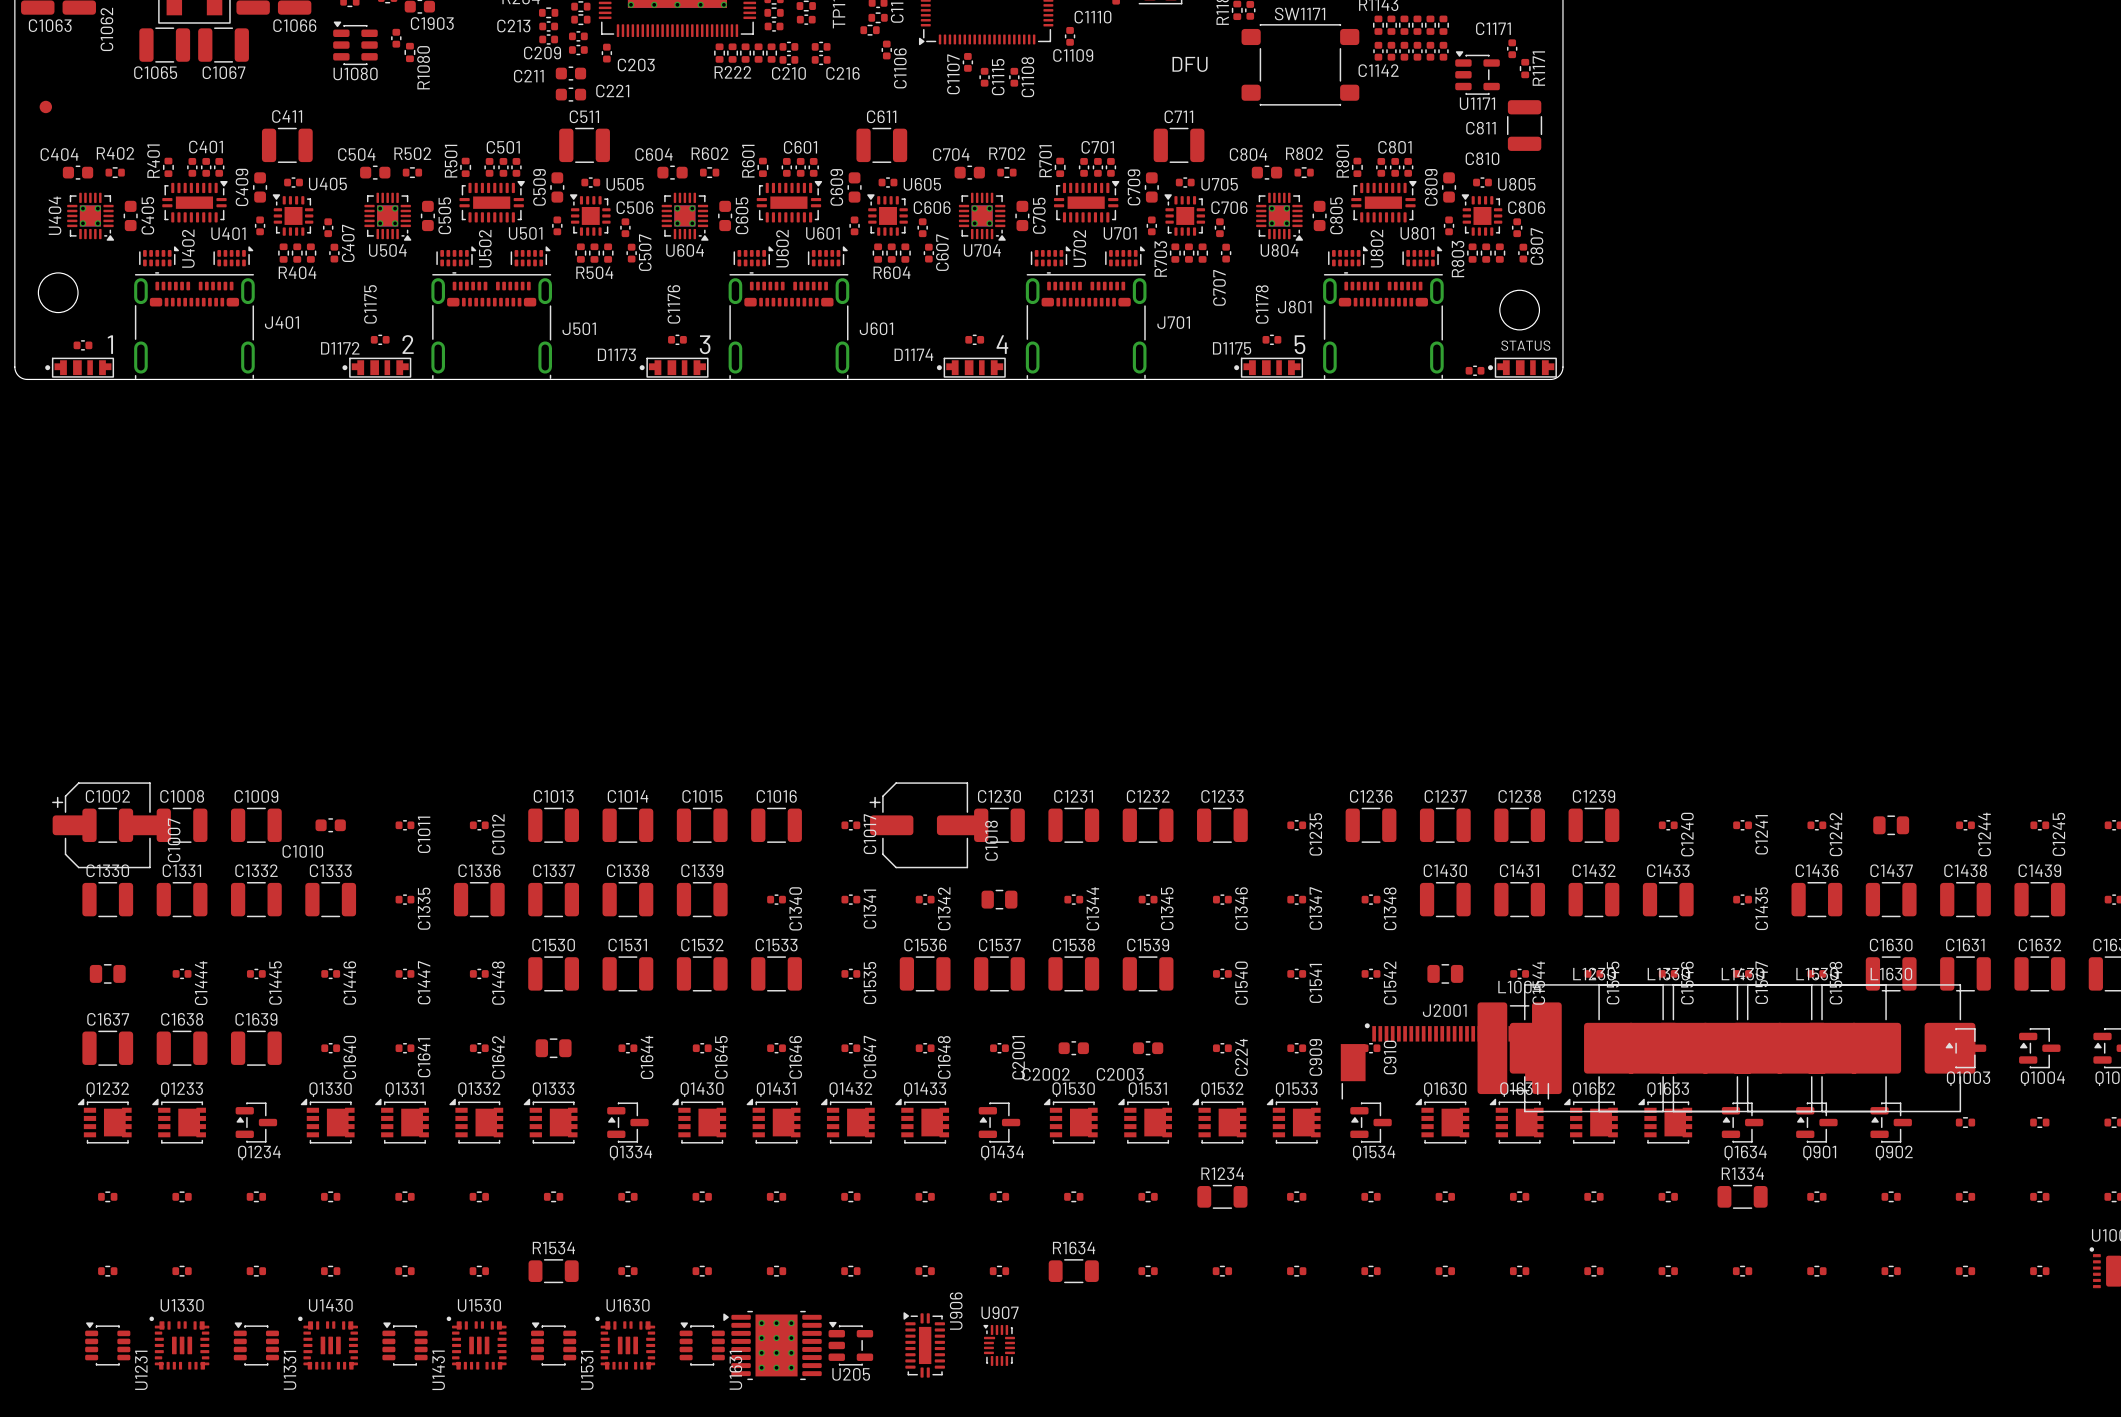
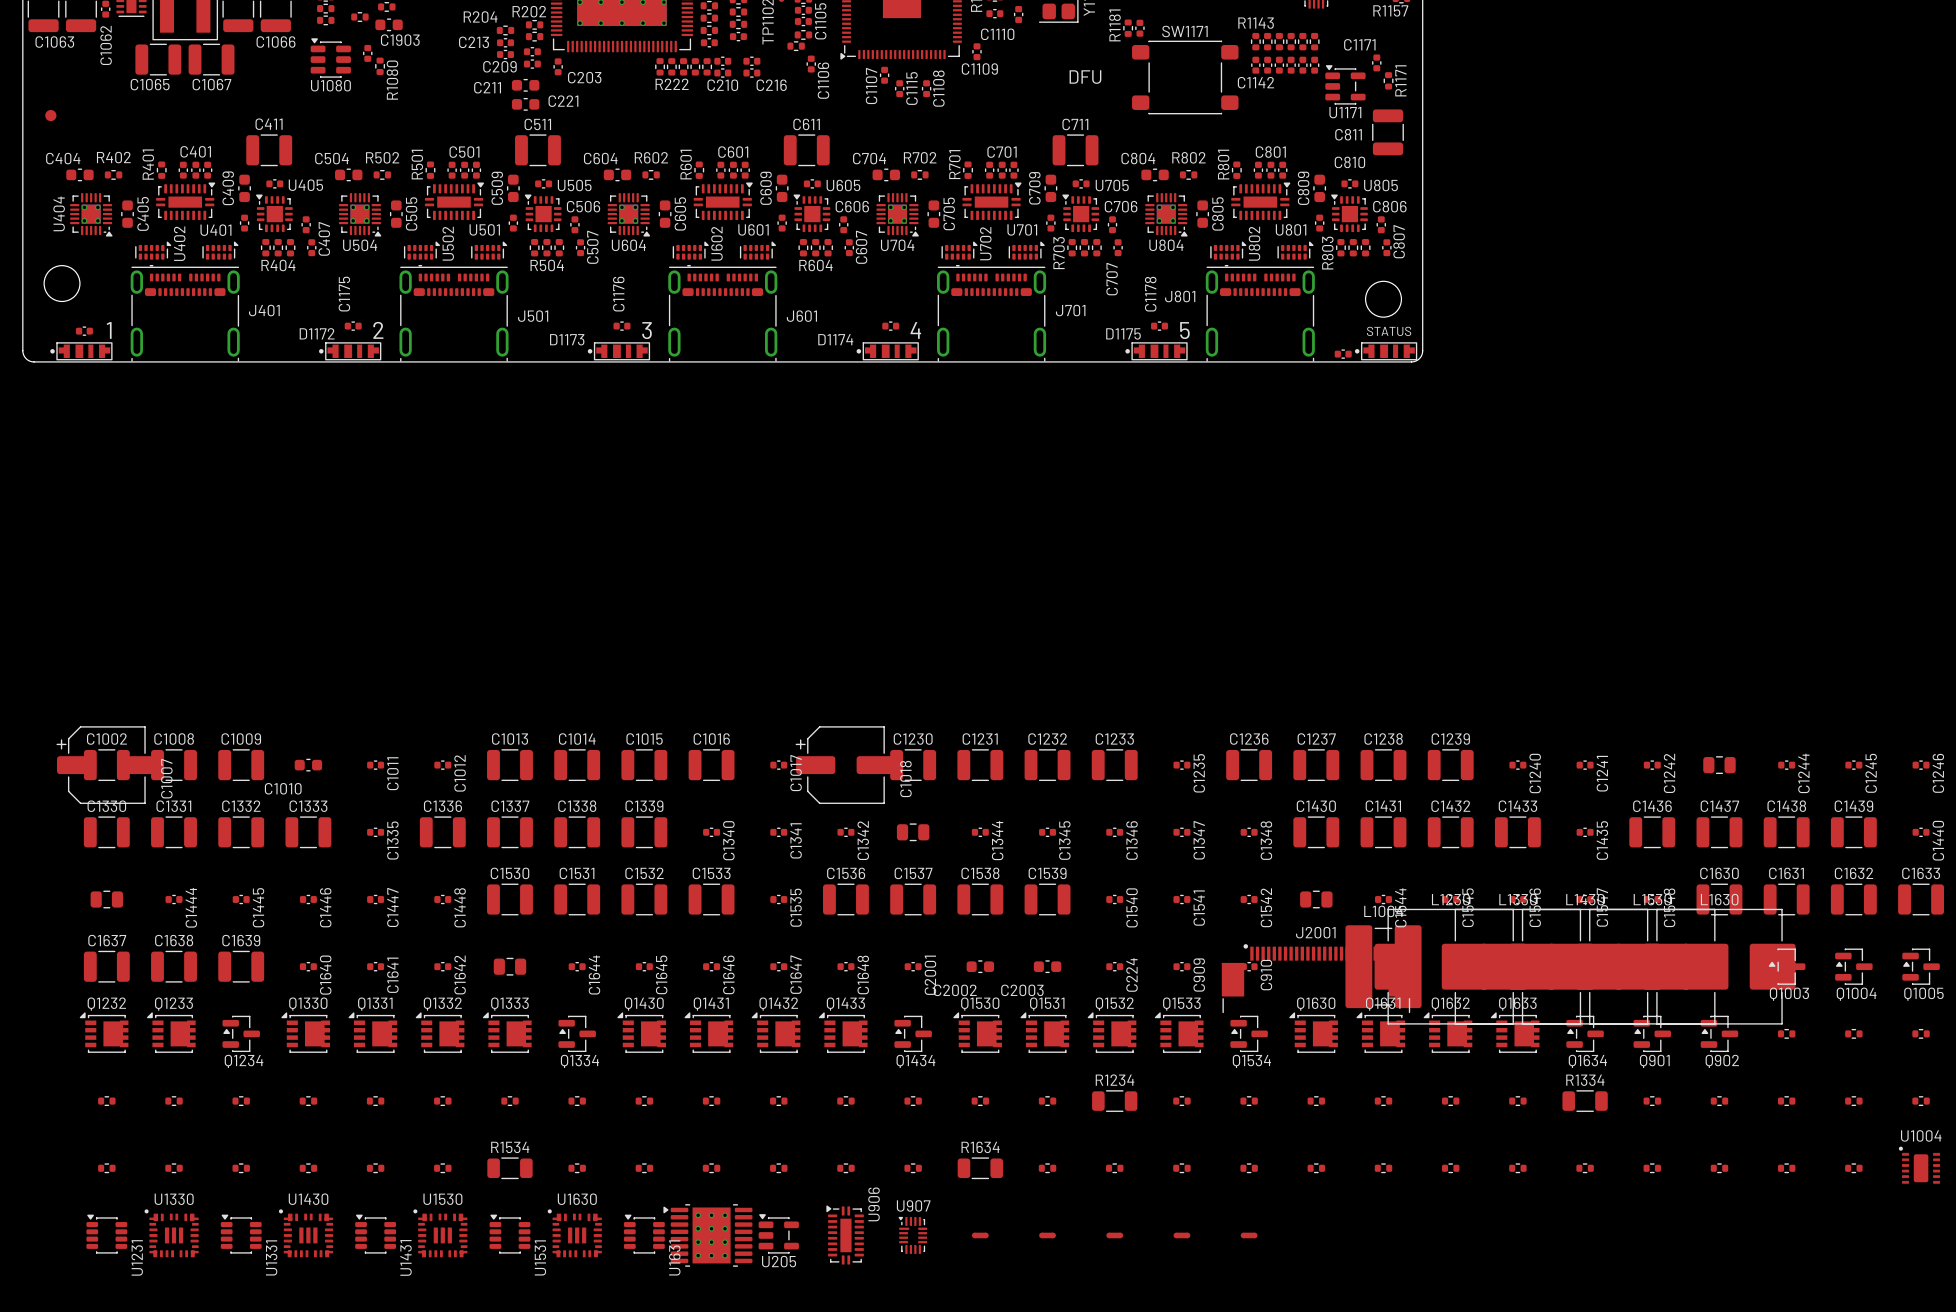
part: none -> (980, 1235)
part: none -> (1047, 1235)
part: none -> (1114, 1235)
part: none -> (1181, 1235)
part: none -> (1249, 1235)

